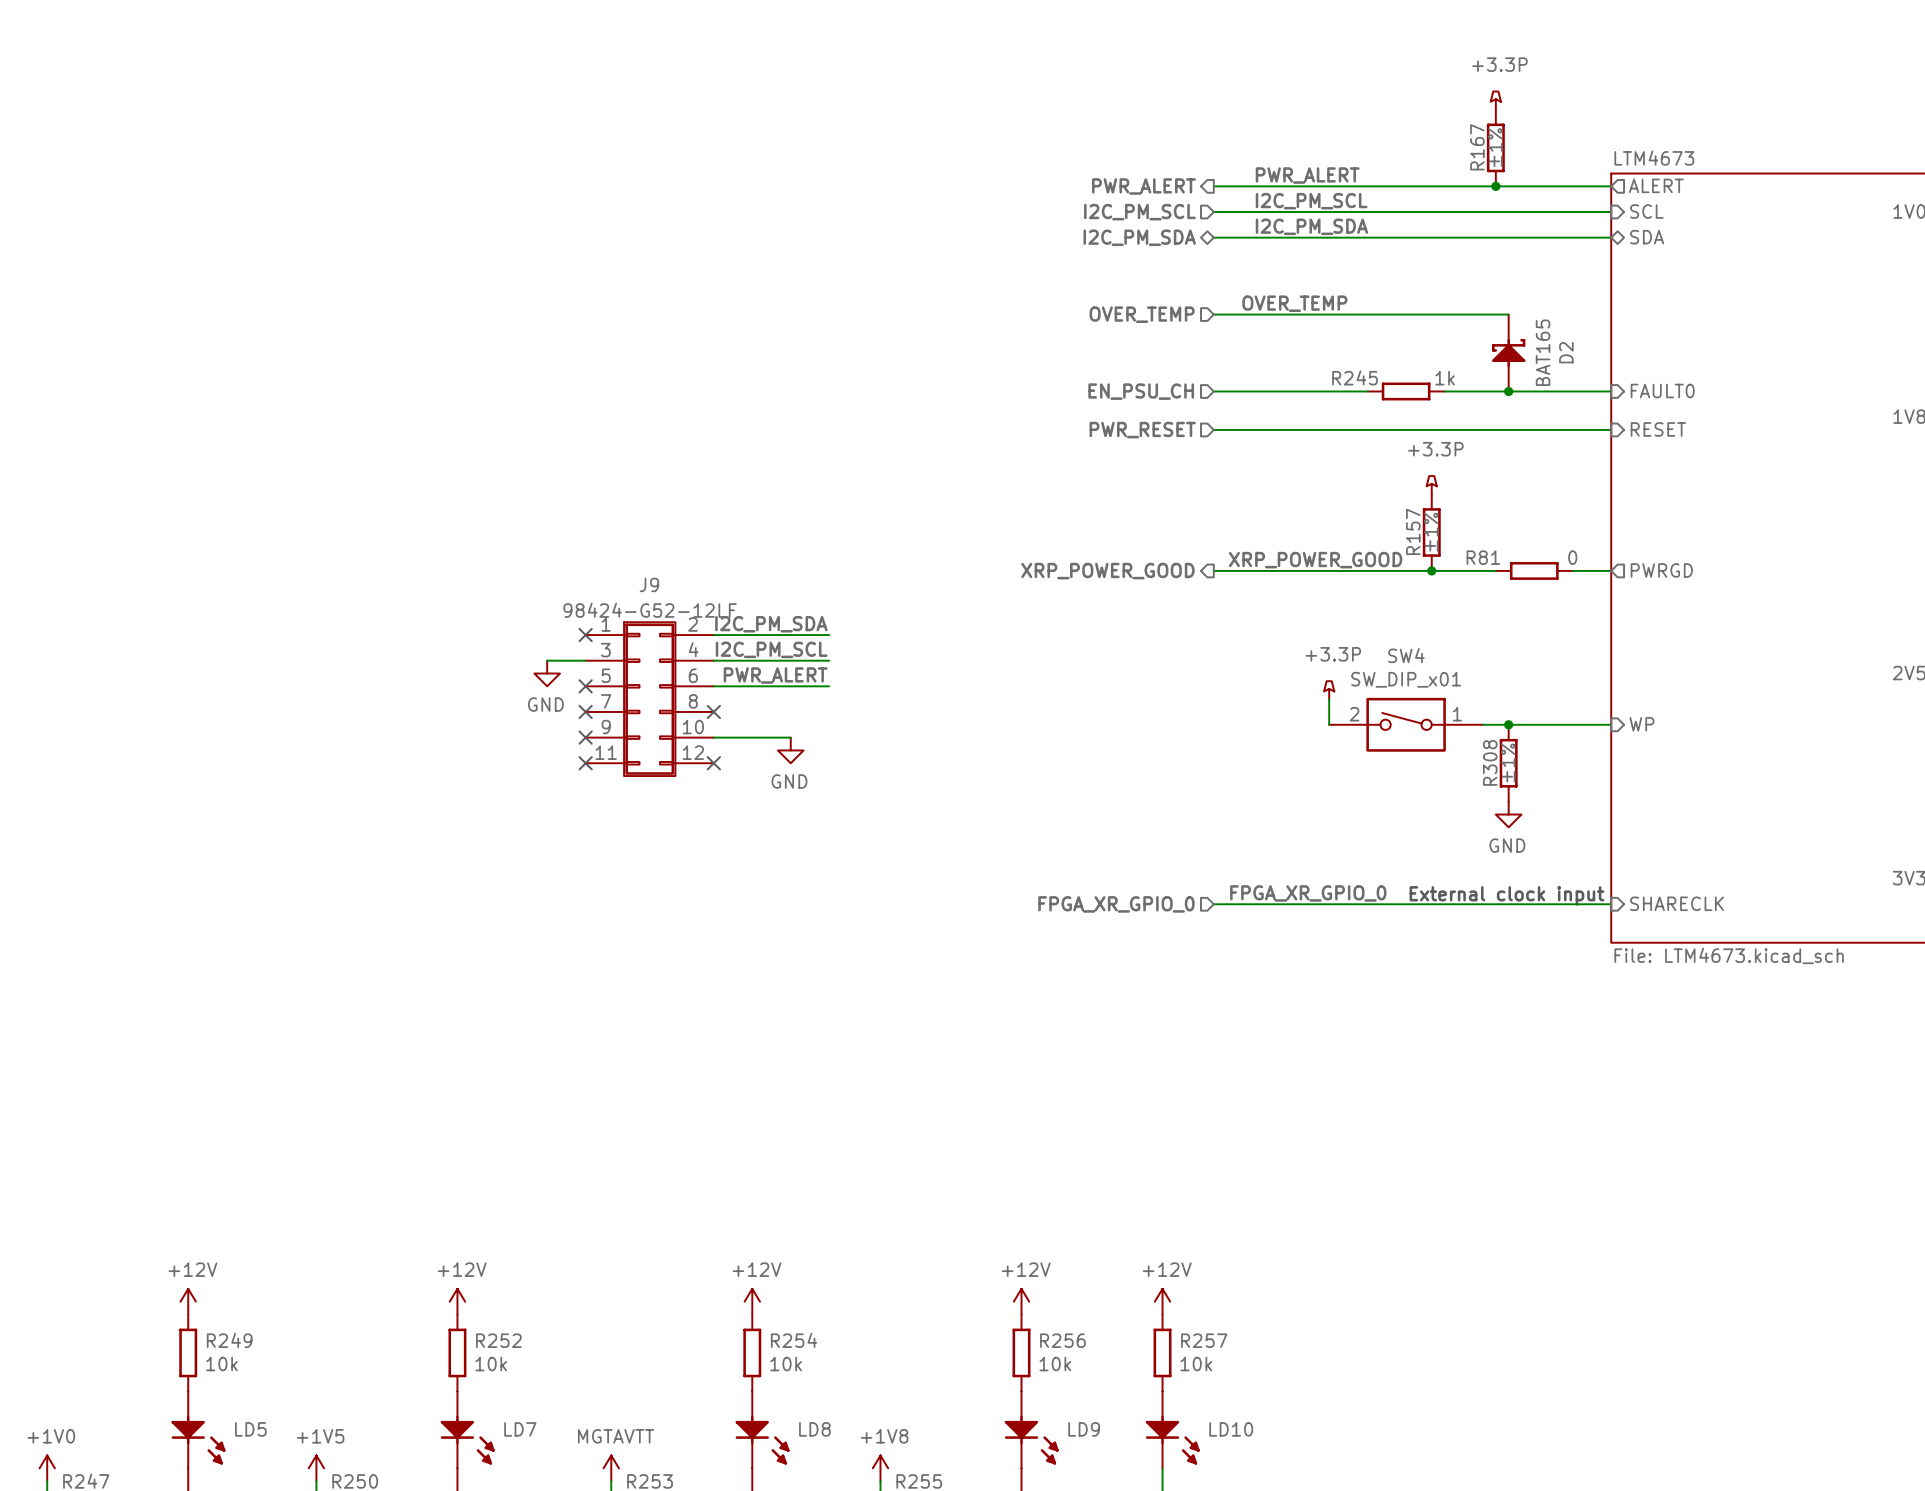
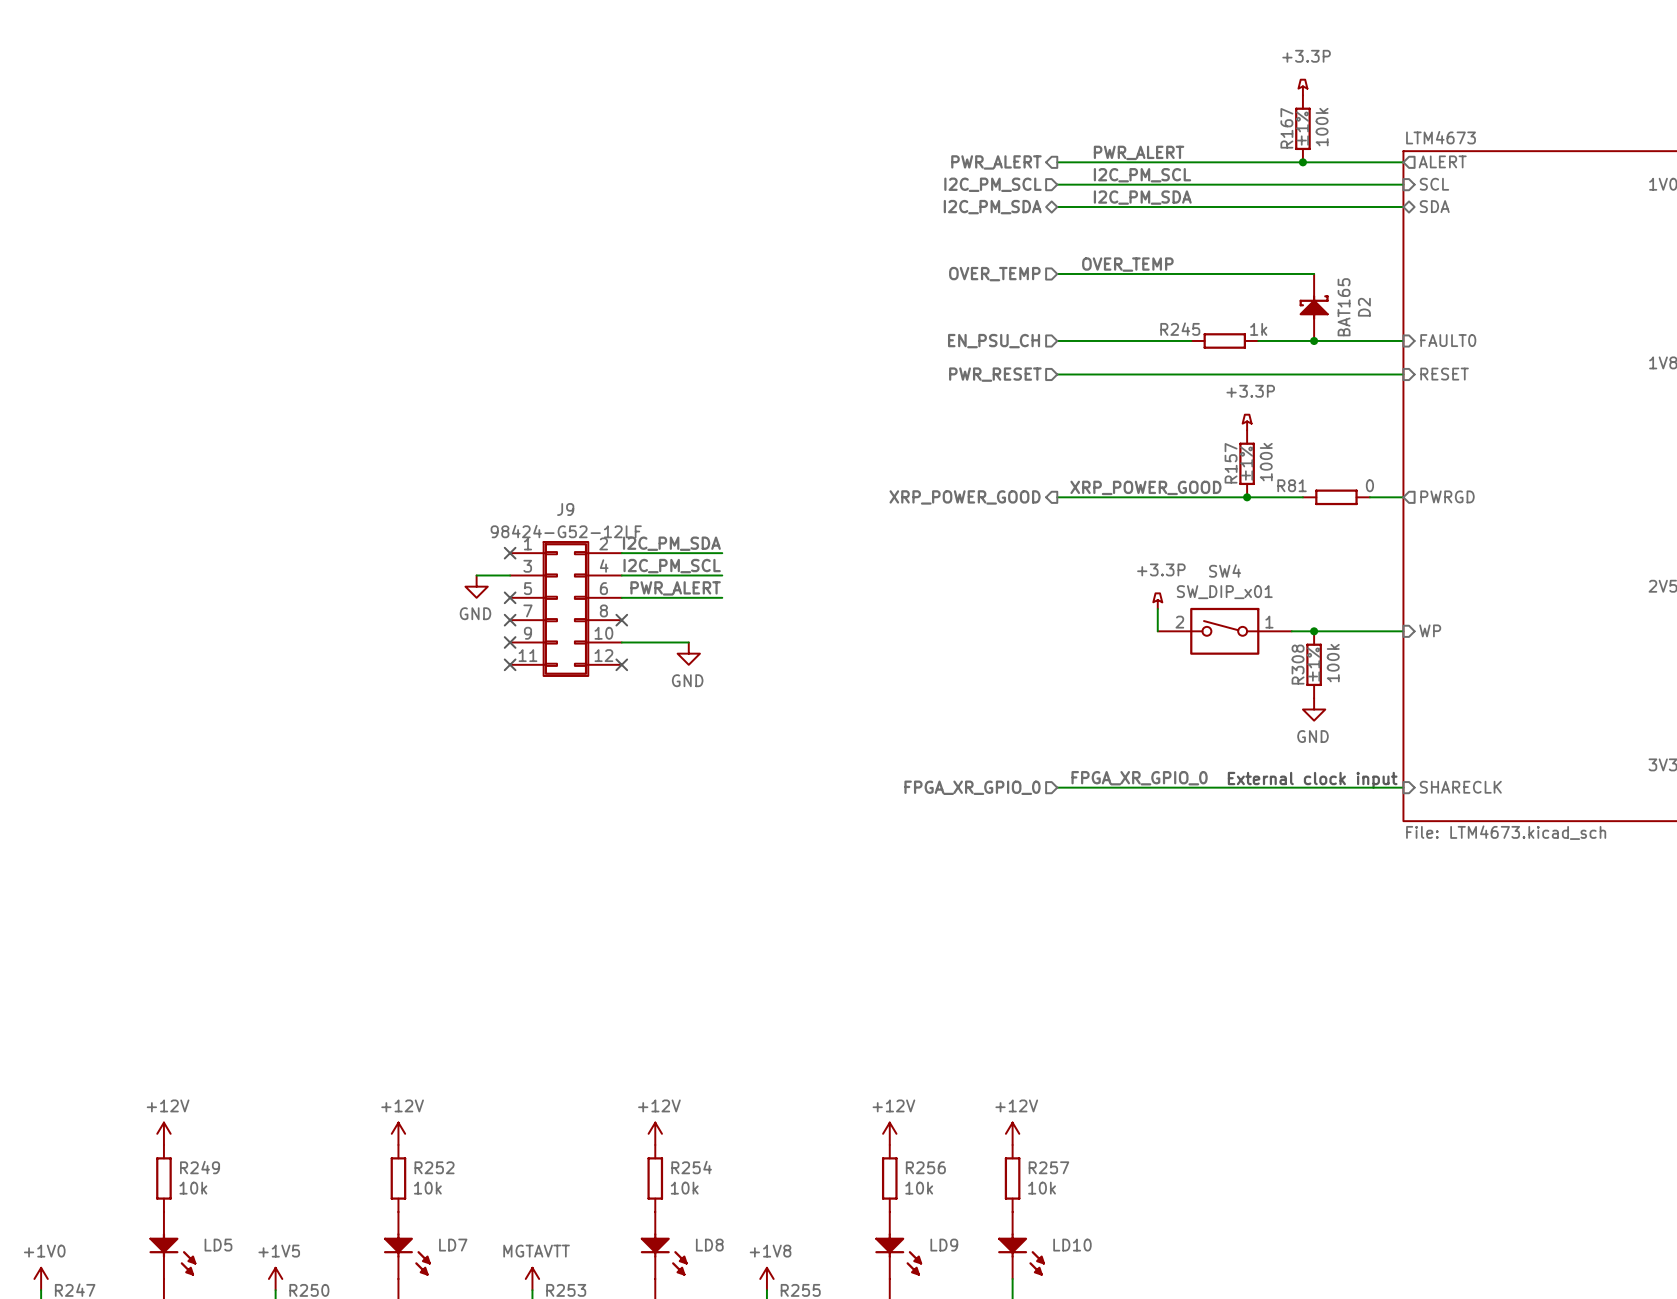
R167 text: none -> 100k (1322, 127)
R157 text: none -> 100k (1266, 462)
R308 text: none -> 100k (1333, 663)

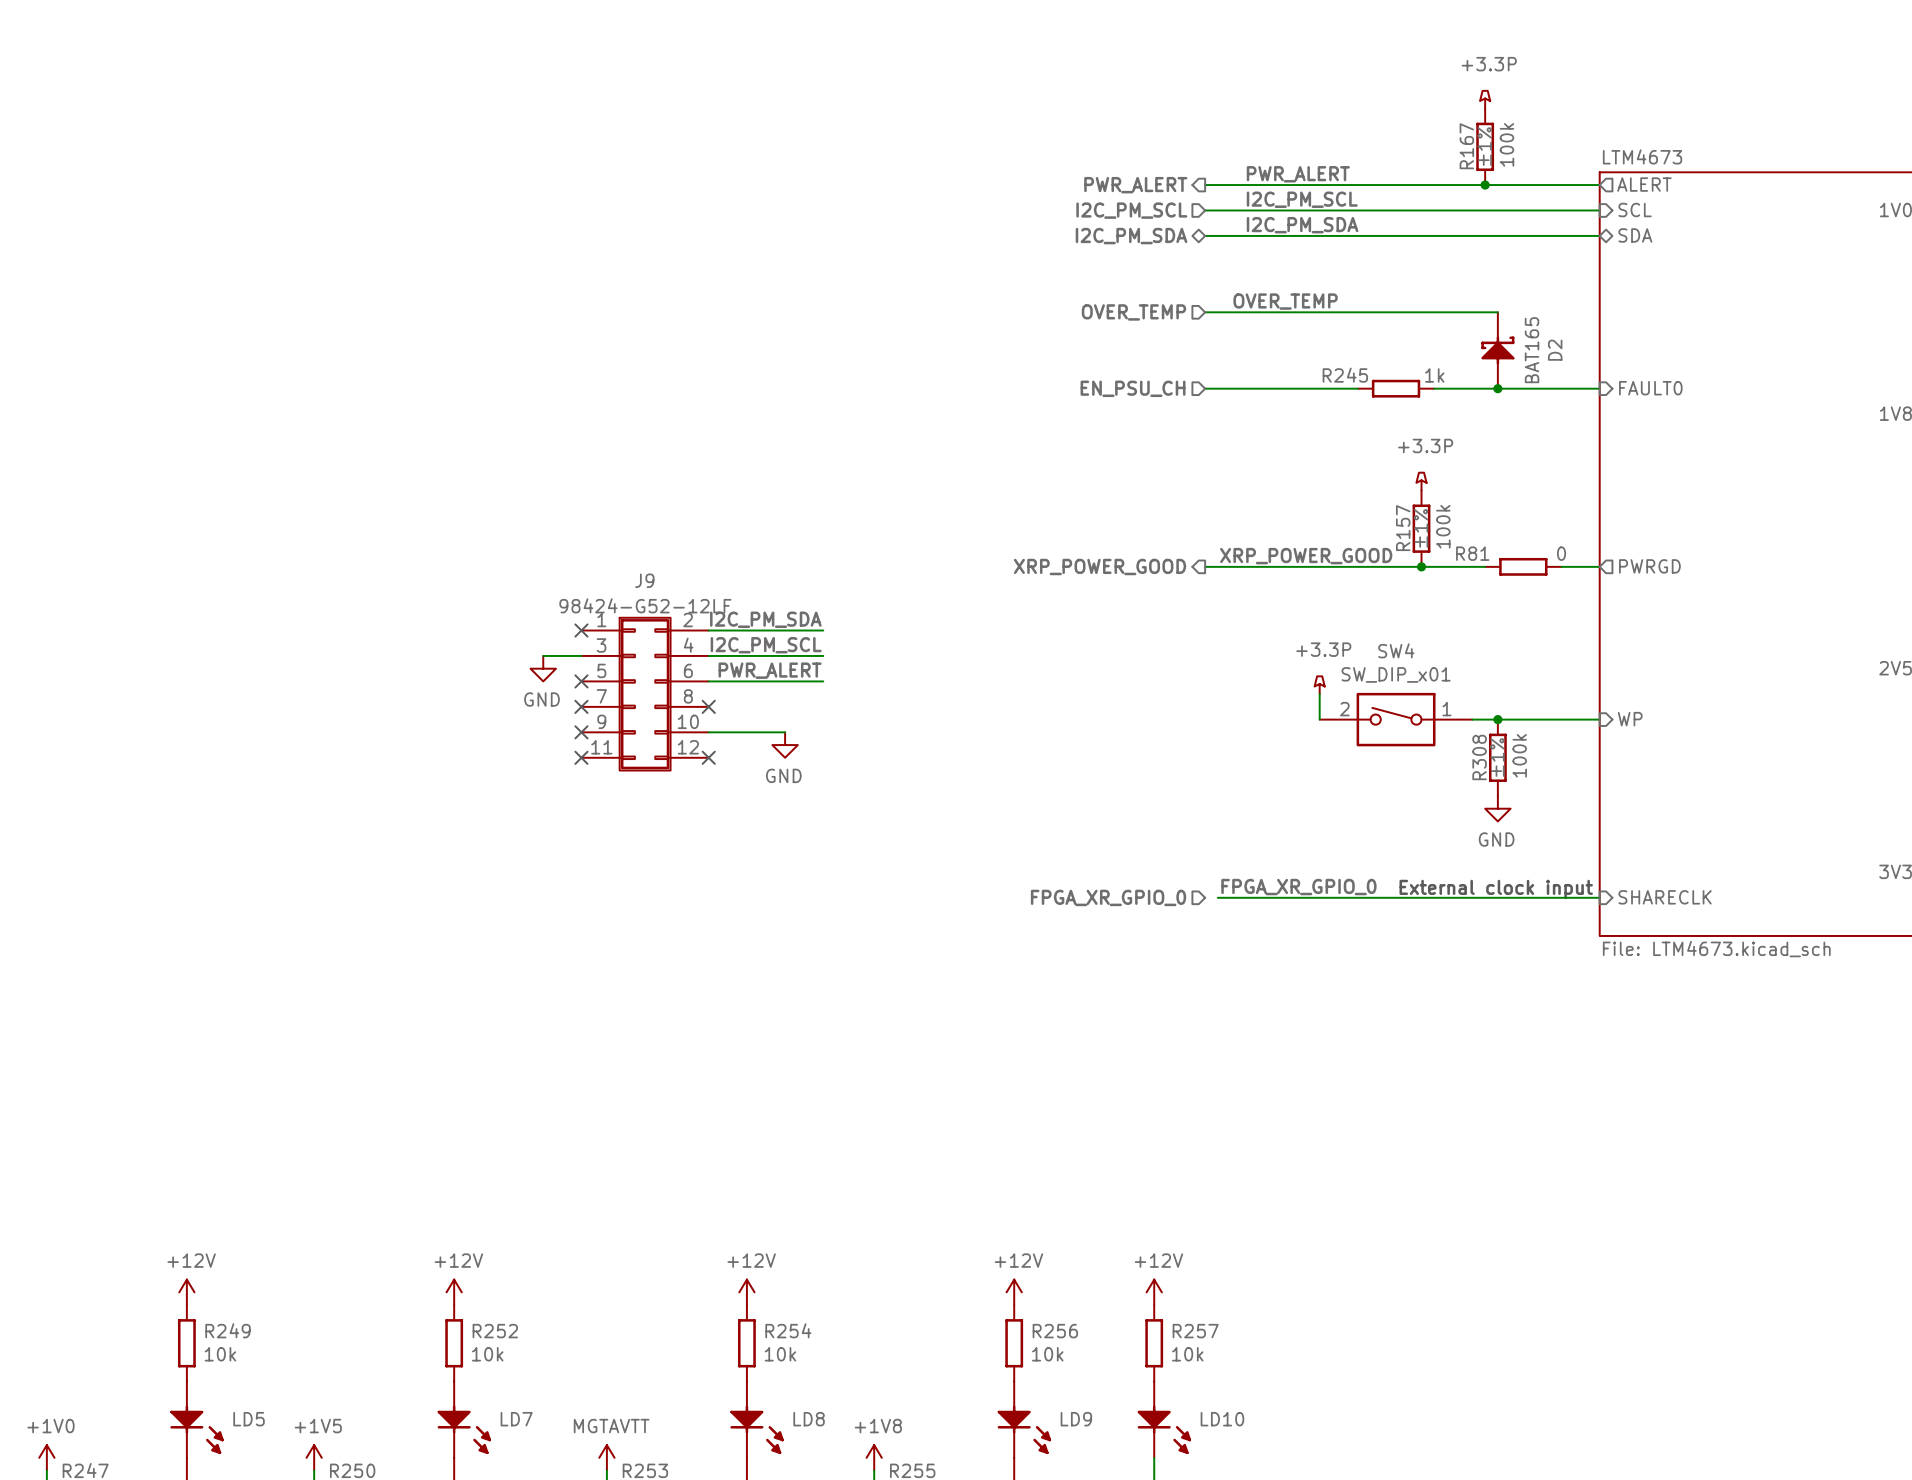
hierarchical label: PWR_RESET (995, 374) -> none
wire: (1057, 374) (1403, 374) -> none
sheet pin: RESET (1444, 374) -> none
wire: (1057, 787) (1068, 787) -> none

